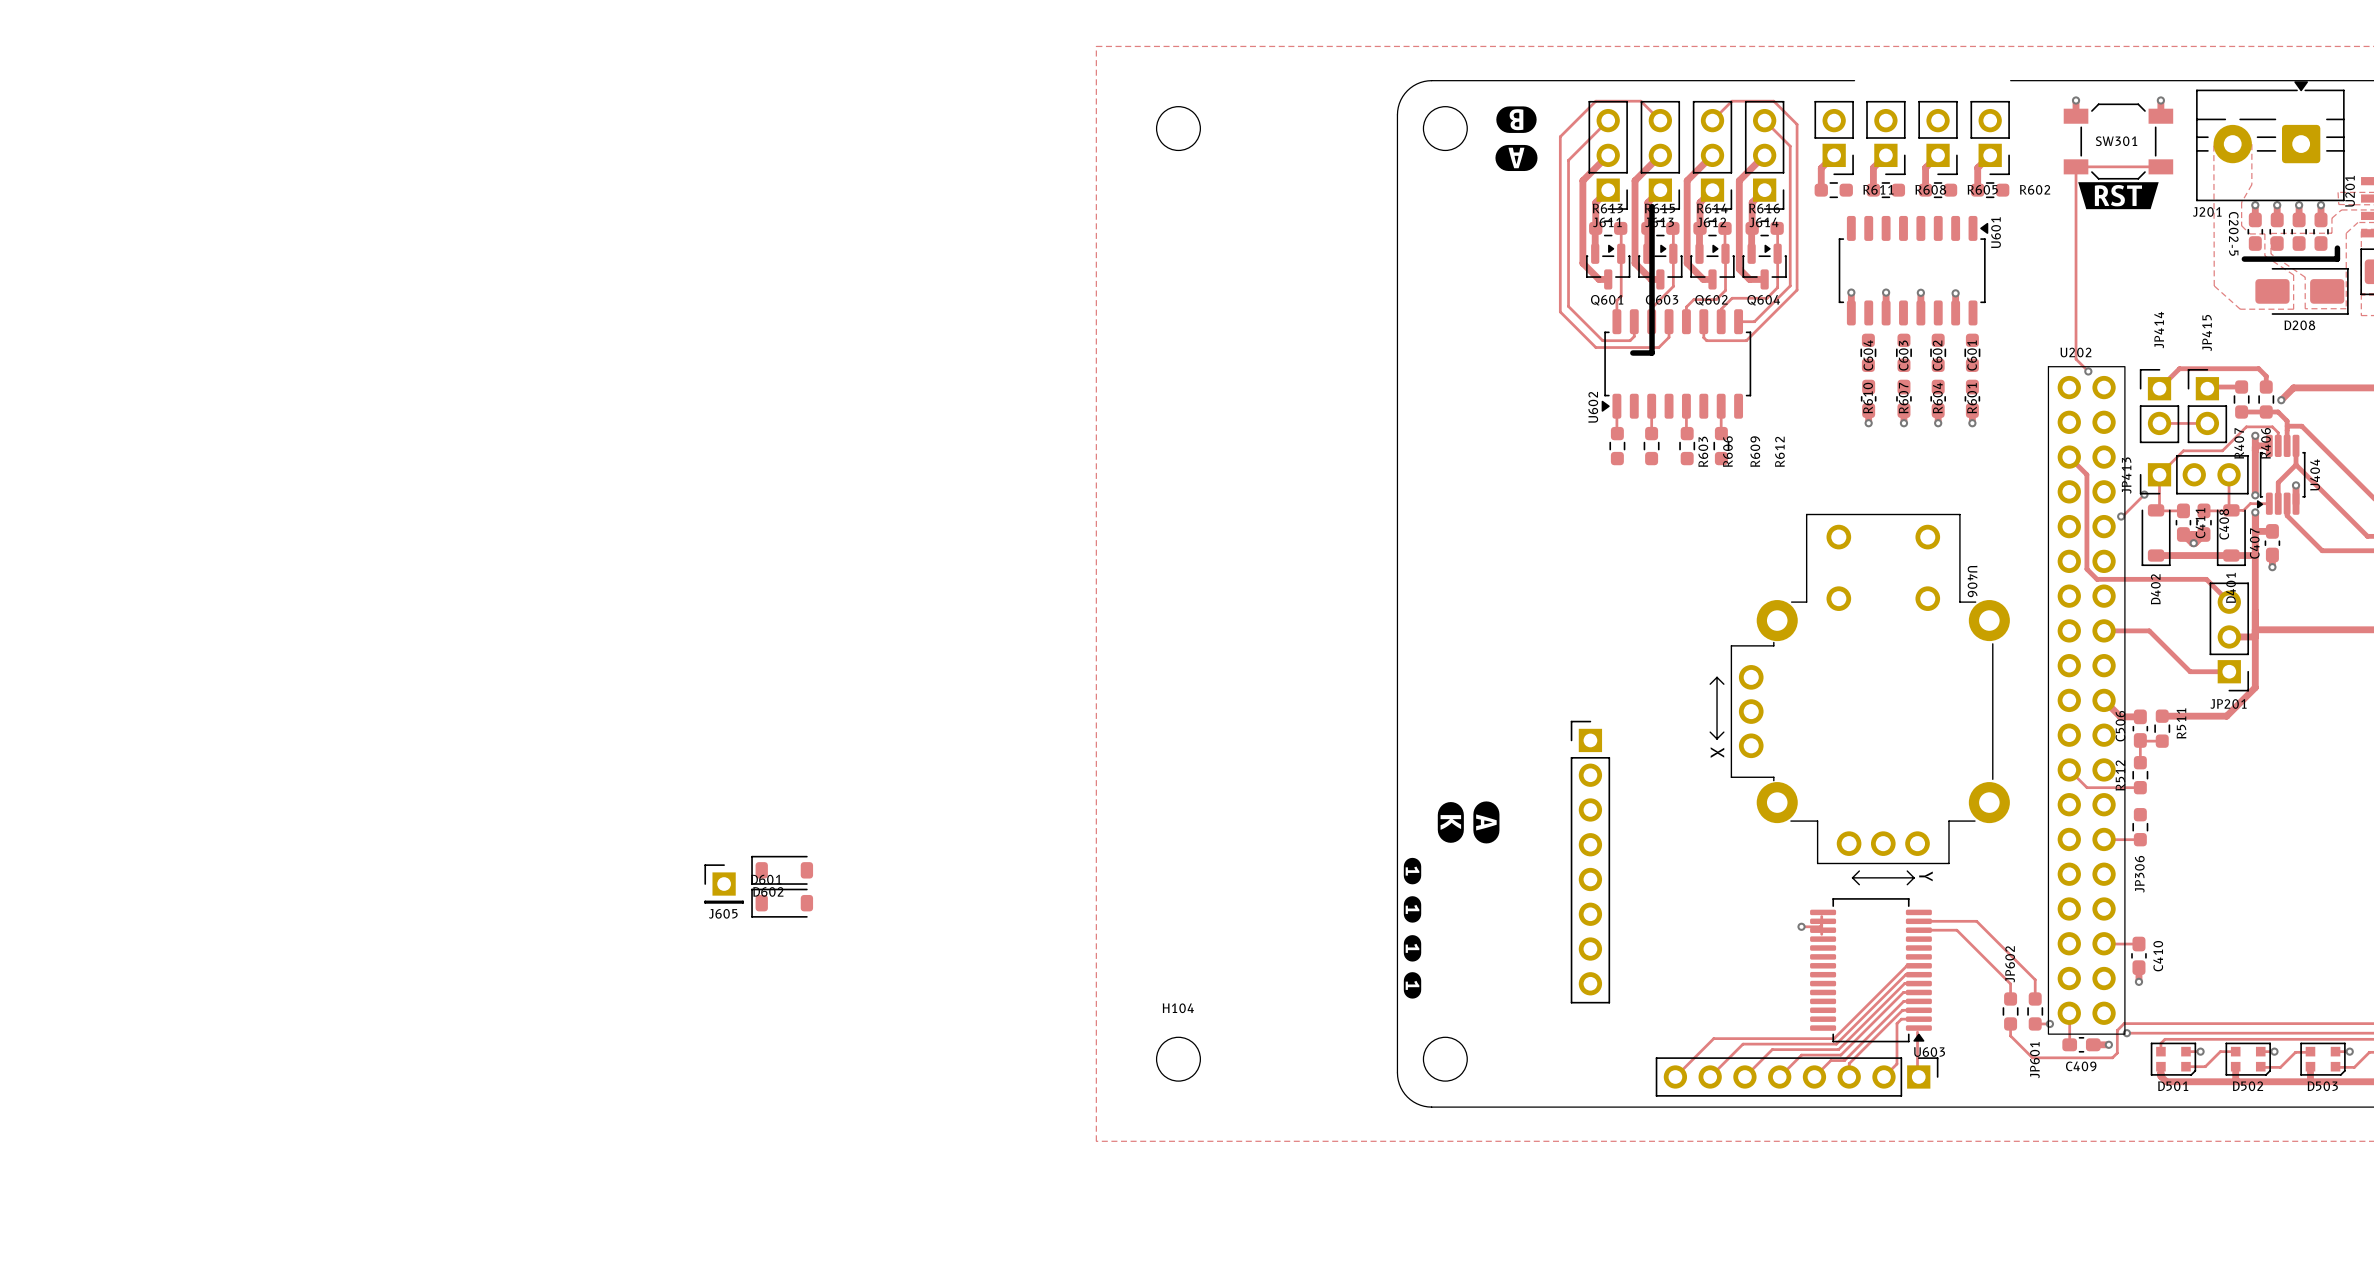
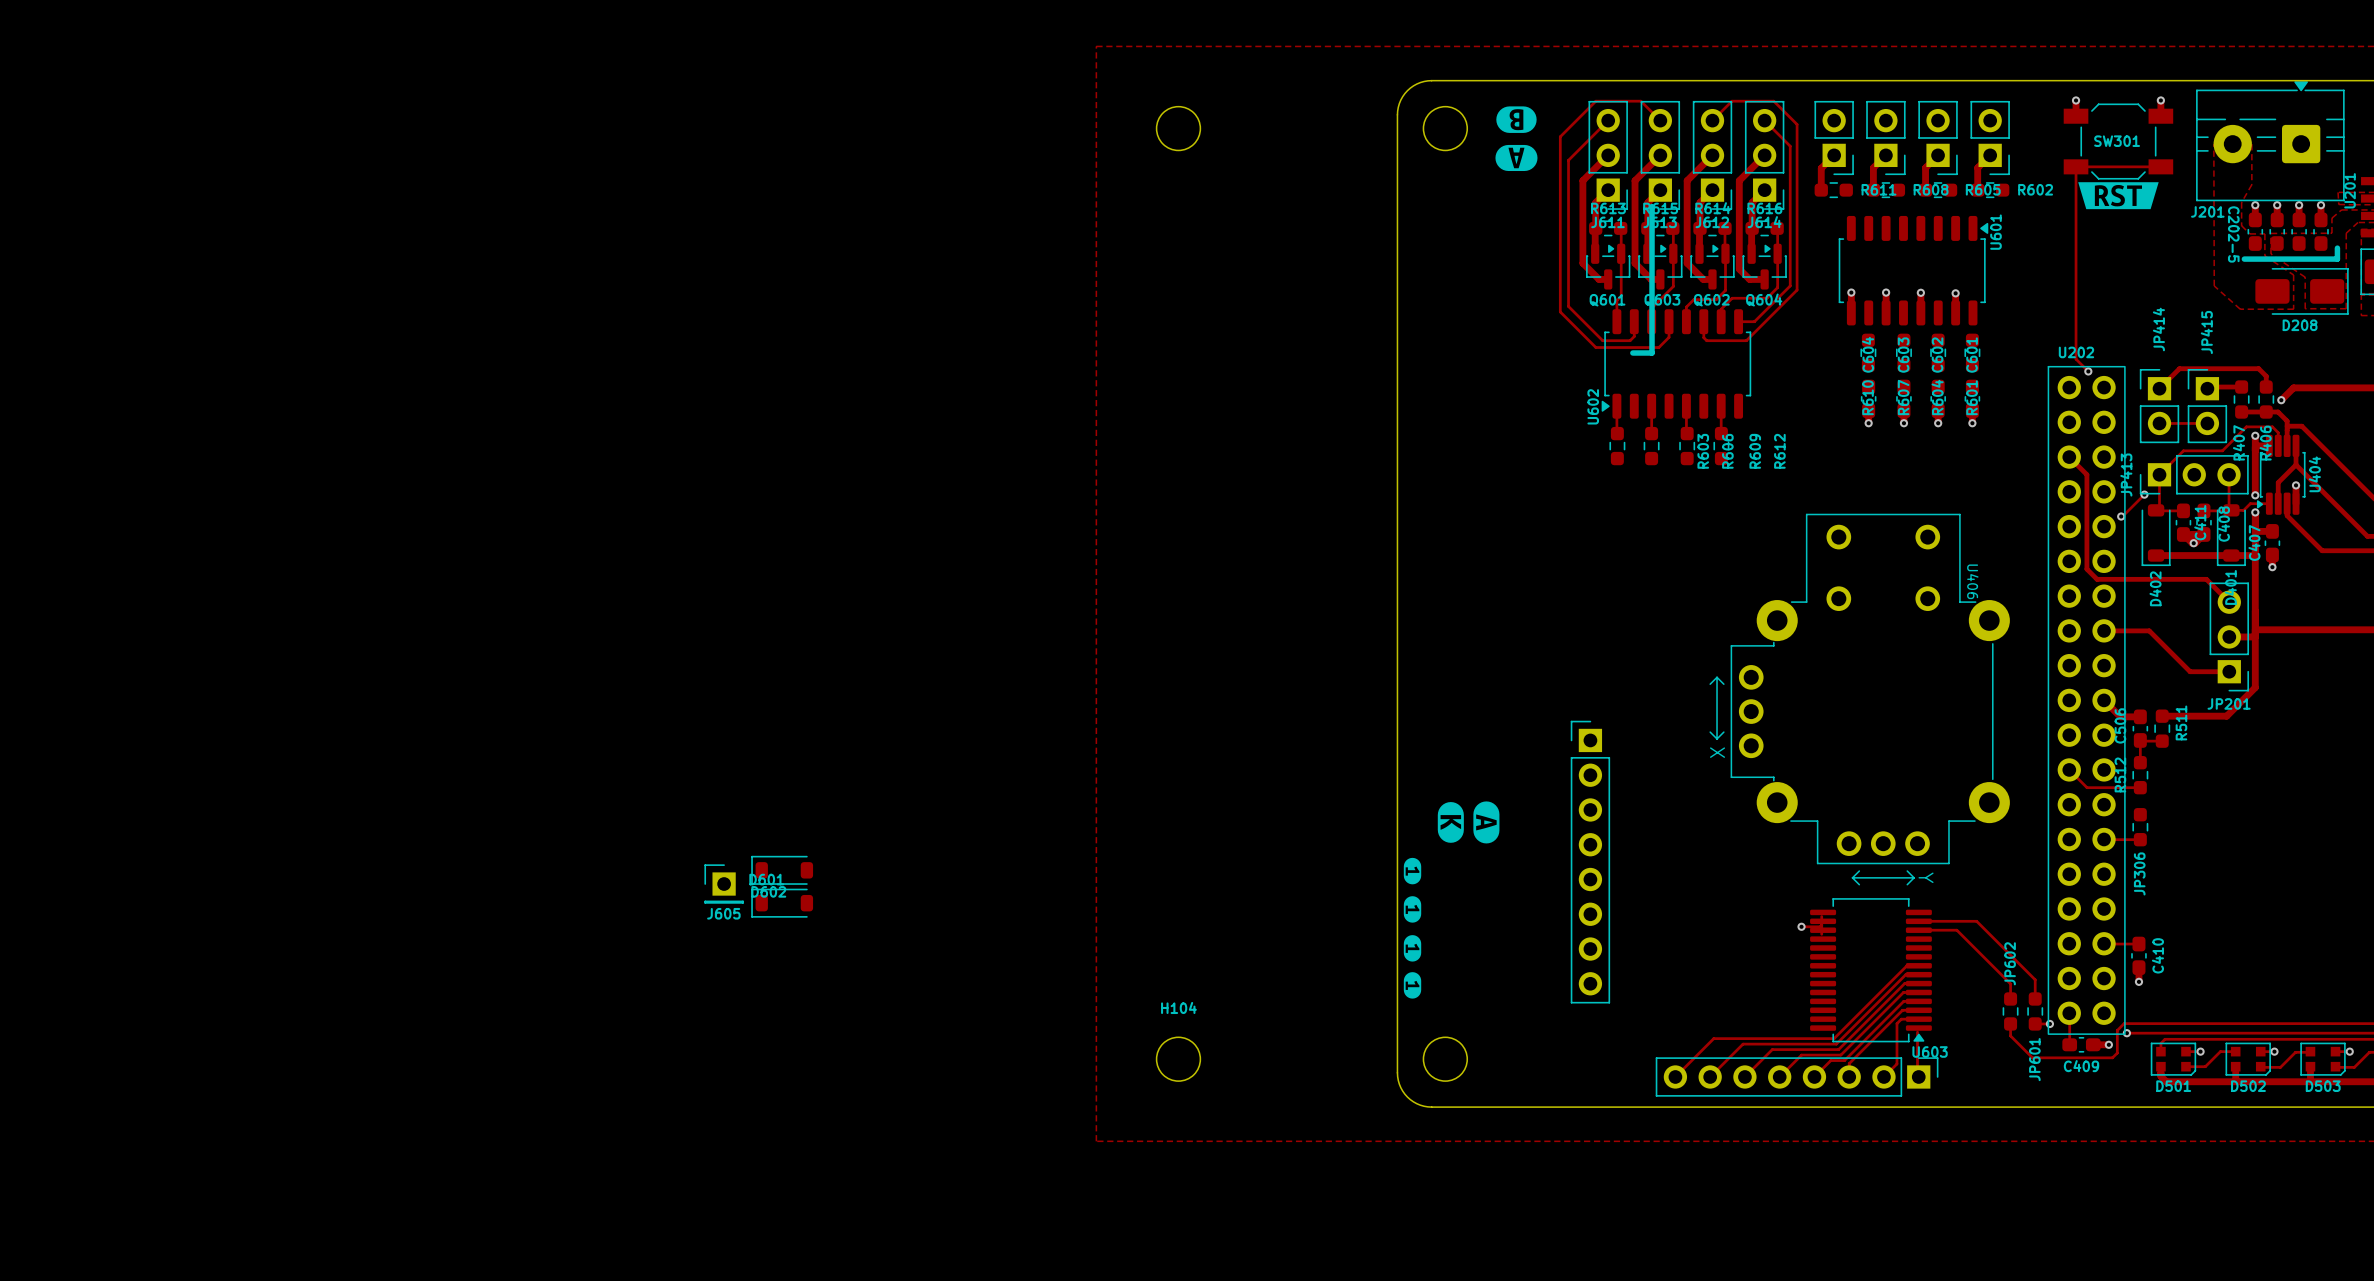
board edge: none -> (1854, 80) (2010, 80)

